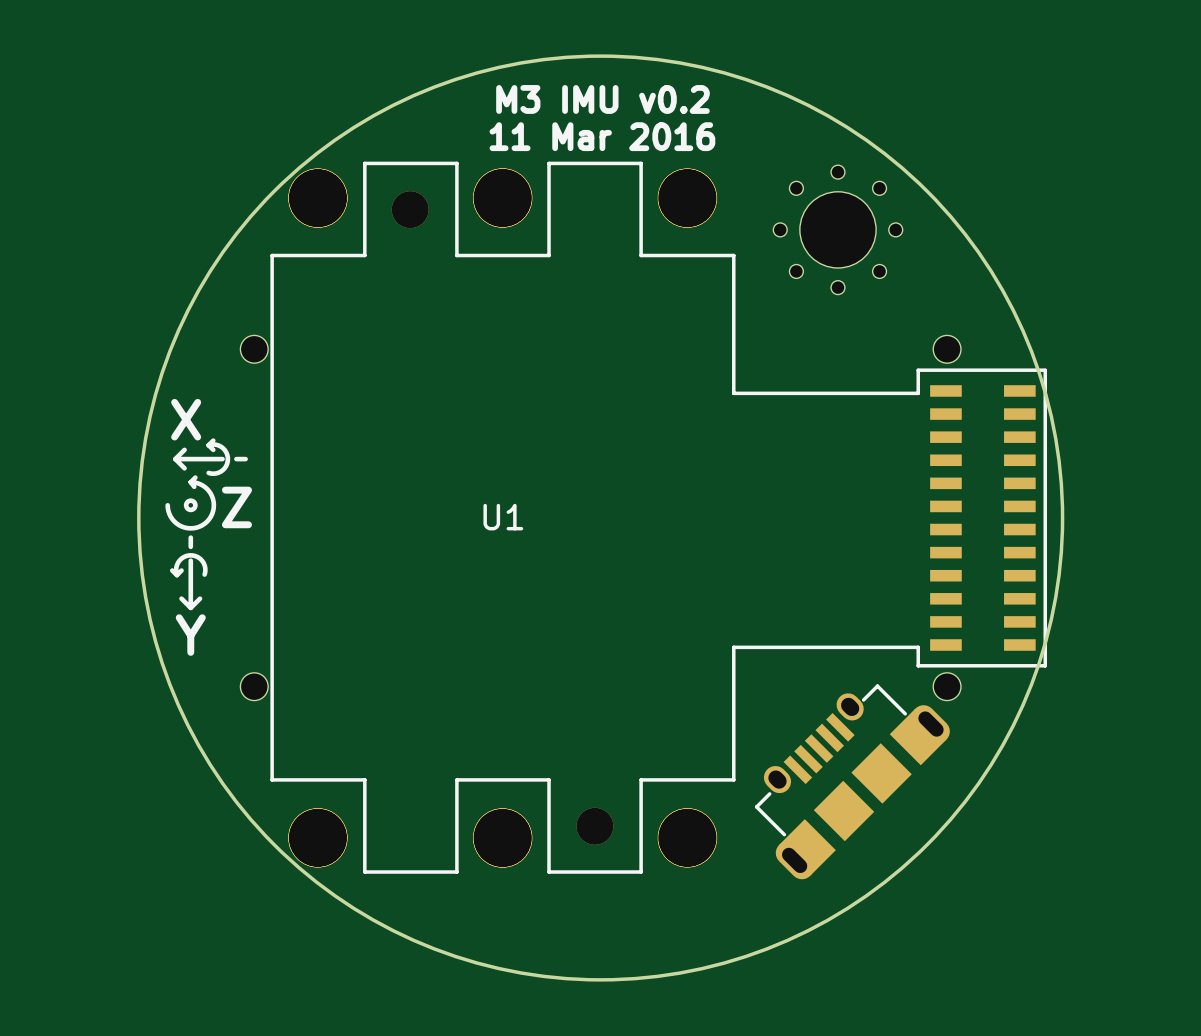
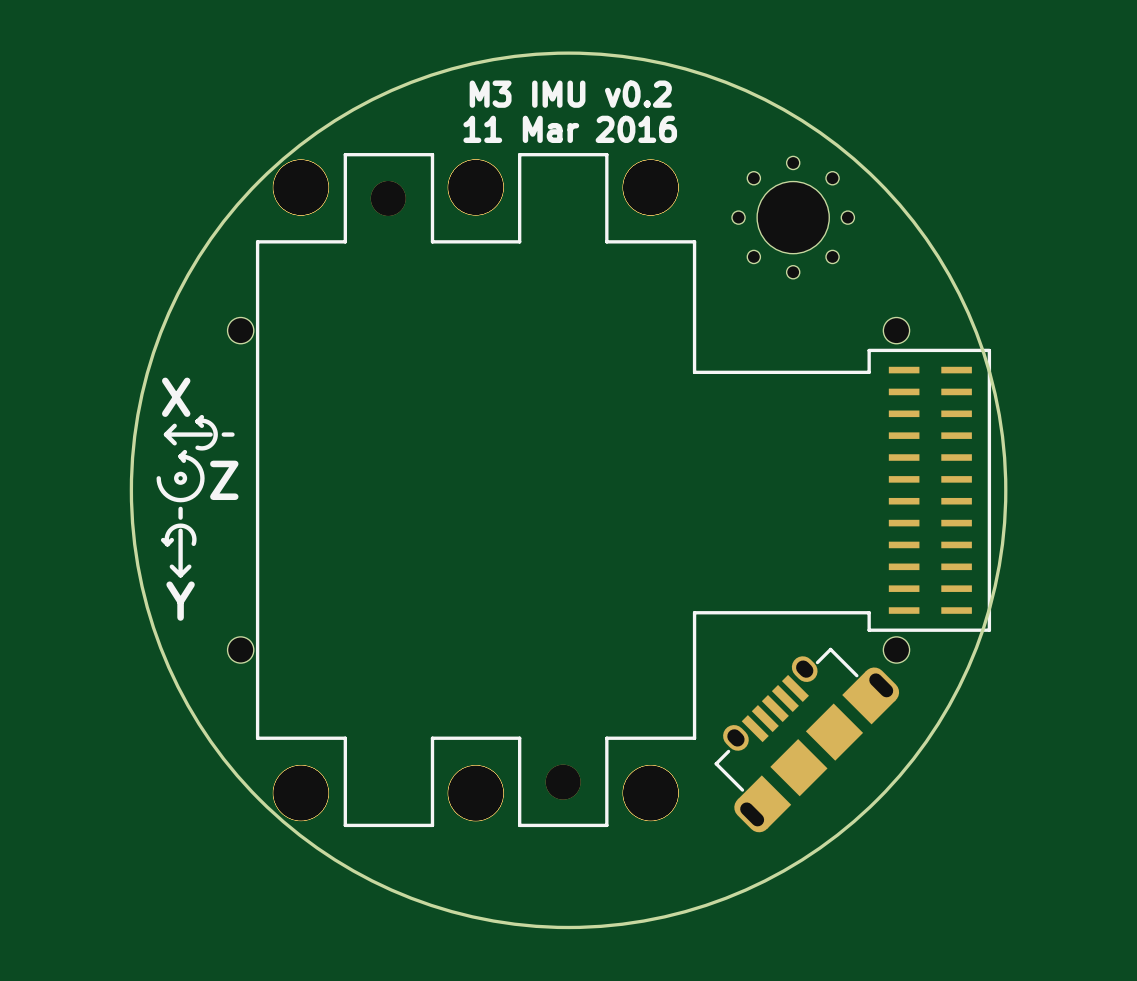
U1: (658, 517) -> none
part: none -> (623, 490)

